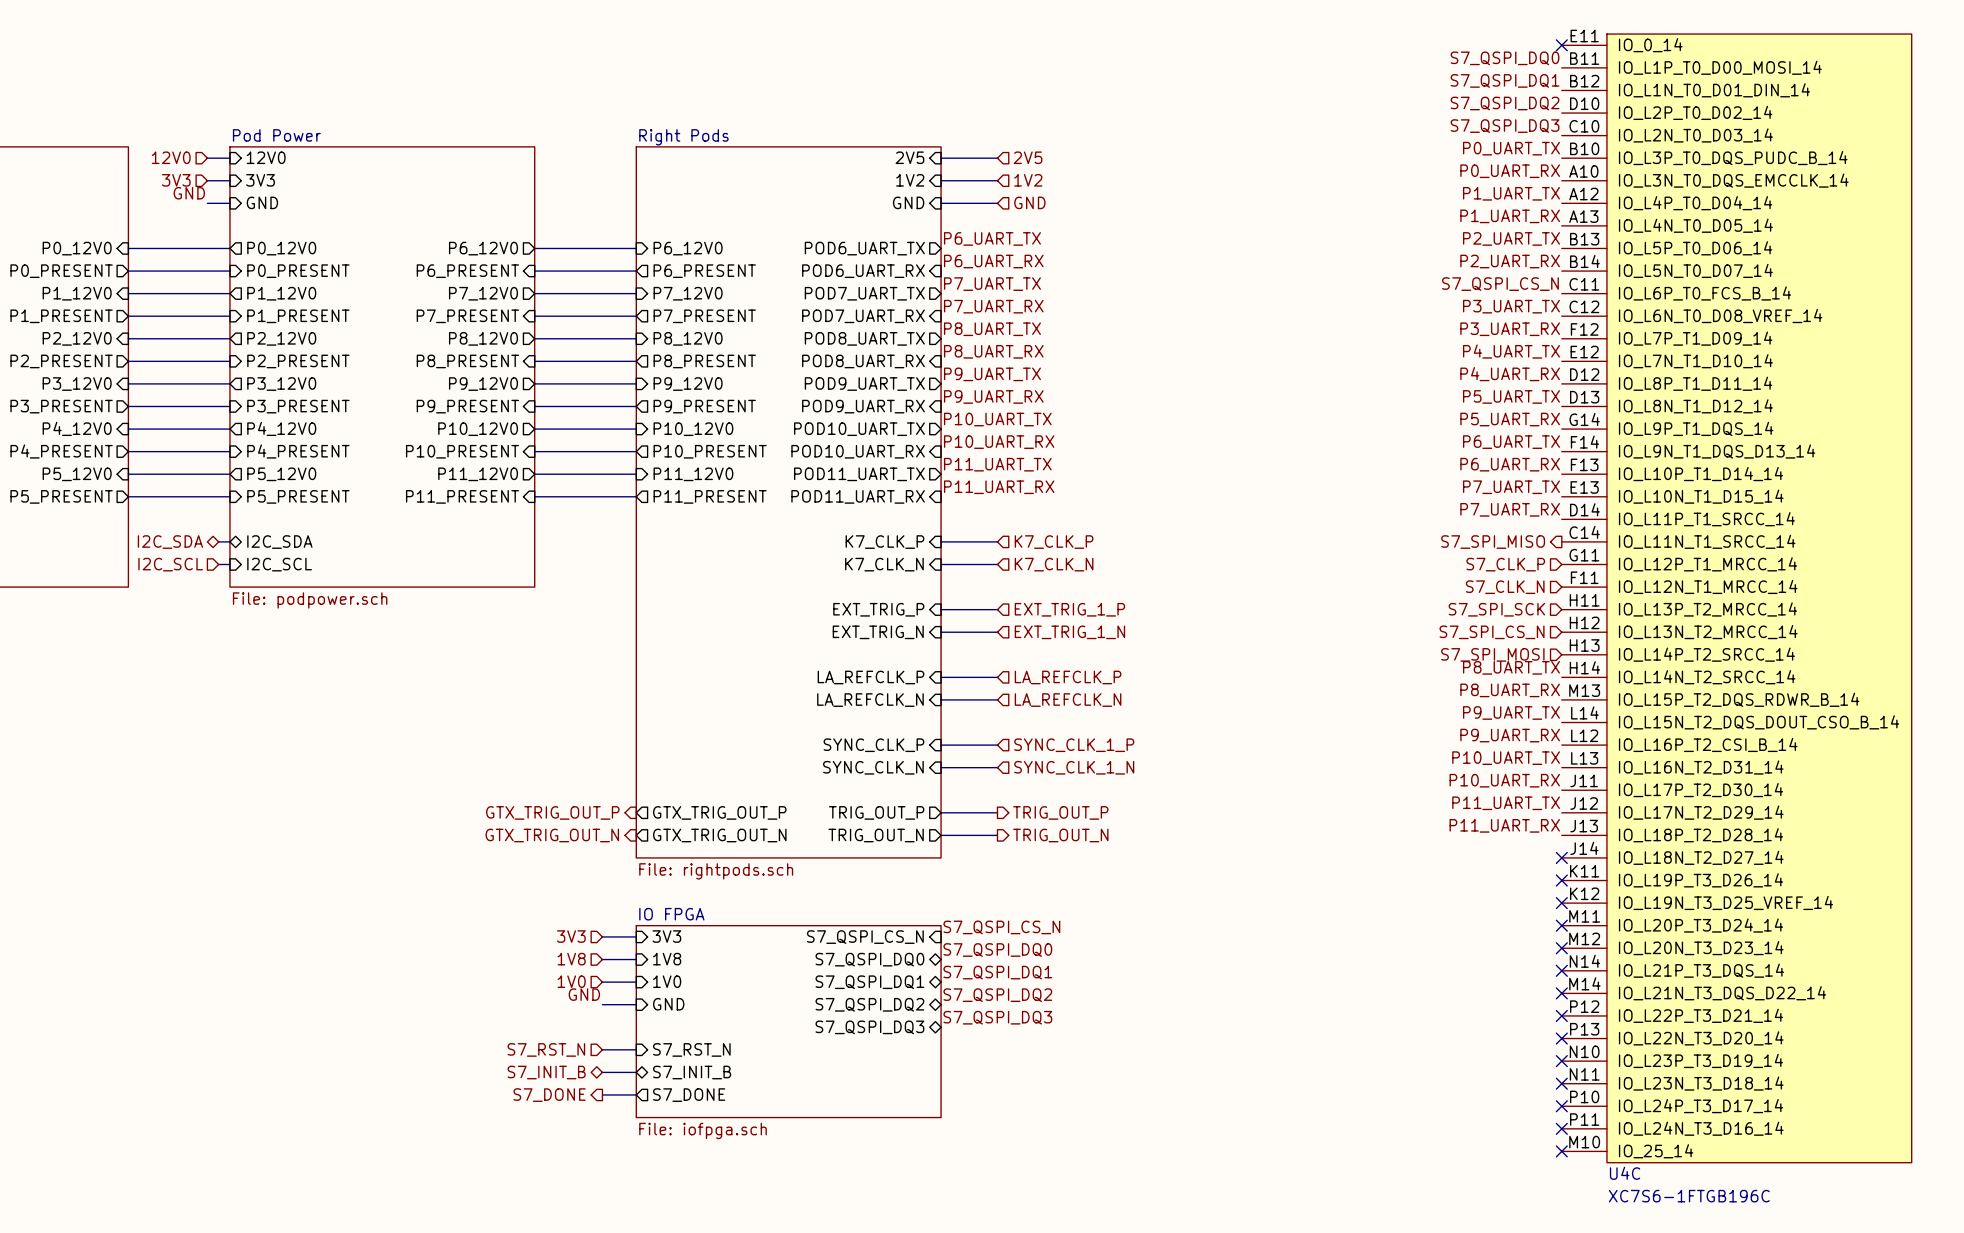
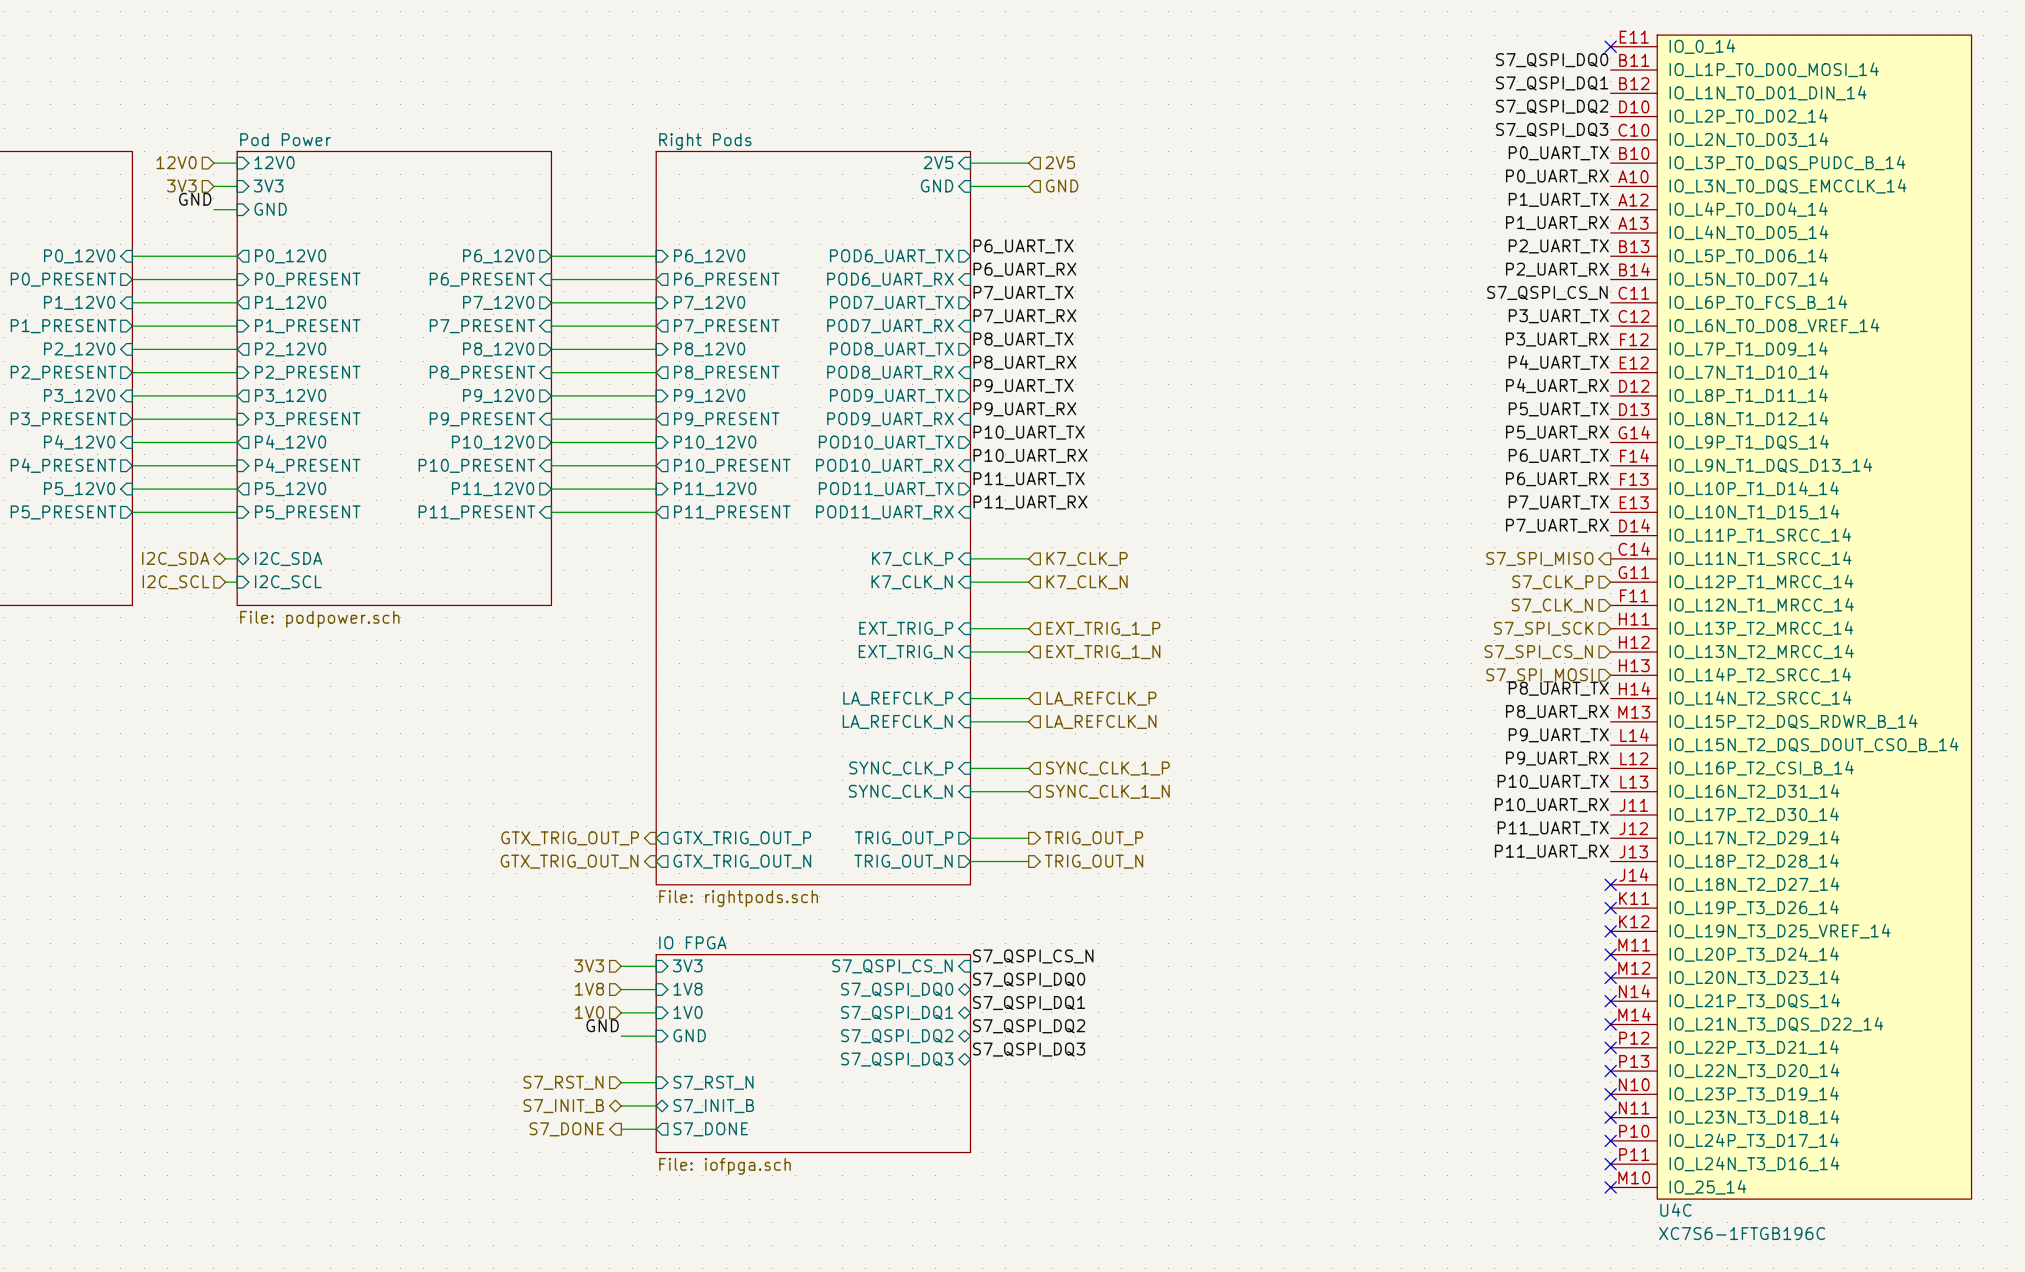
sheet pin: 1V2 (910, 180) -> GND (937, 185)
hierarchical label: 1V2 (1028, 180) -> GND (1062, 185)
sheet pin: GND (908, 202) -> none
hierarchical label: GND (1029, 202) -> none
wire: (941, 203) (997, 203) -> none

